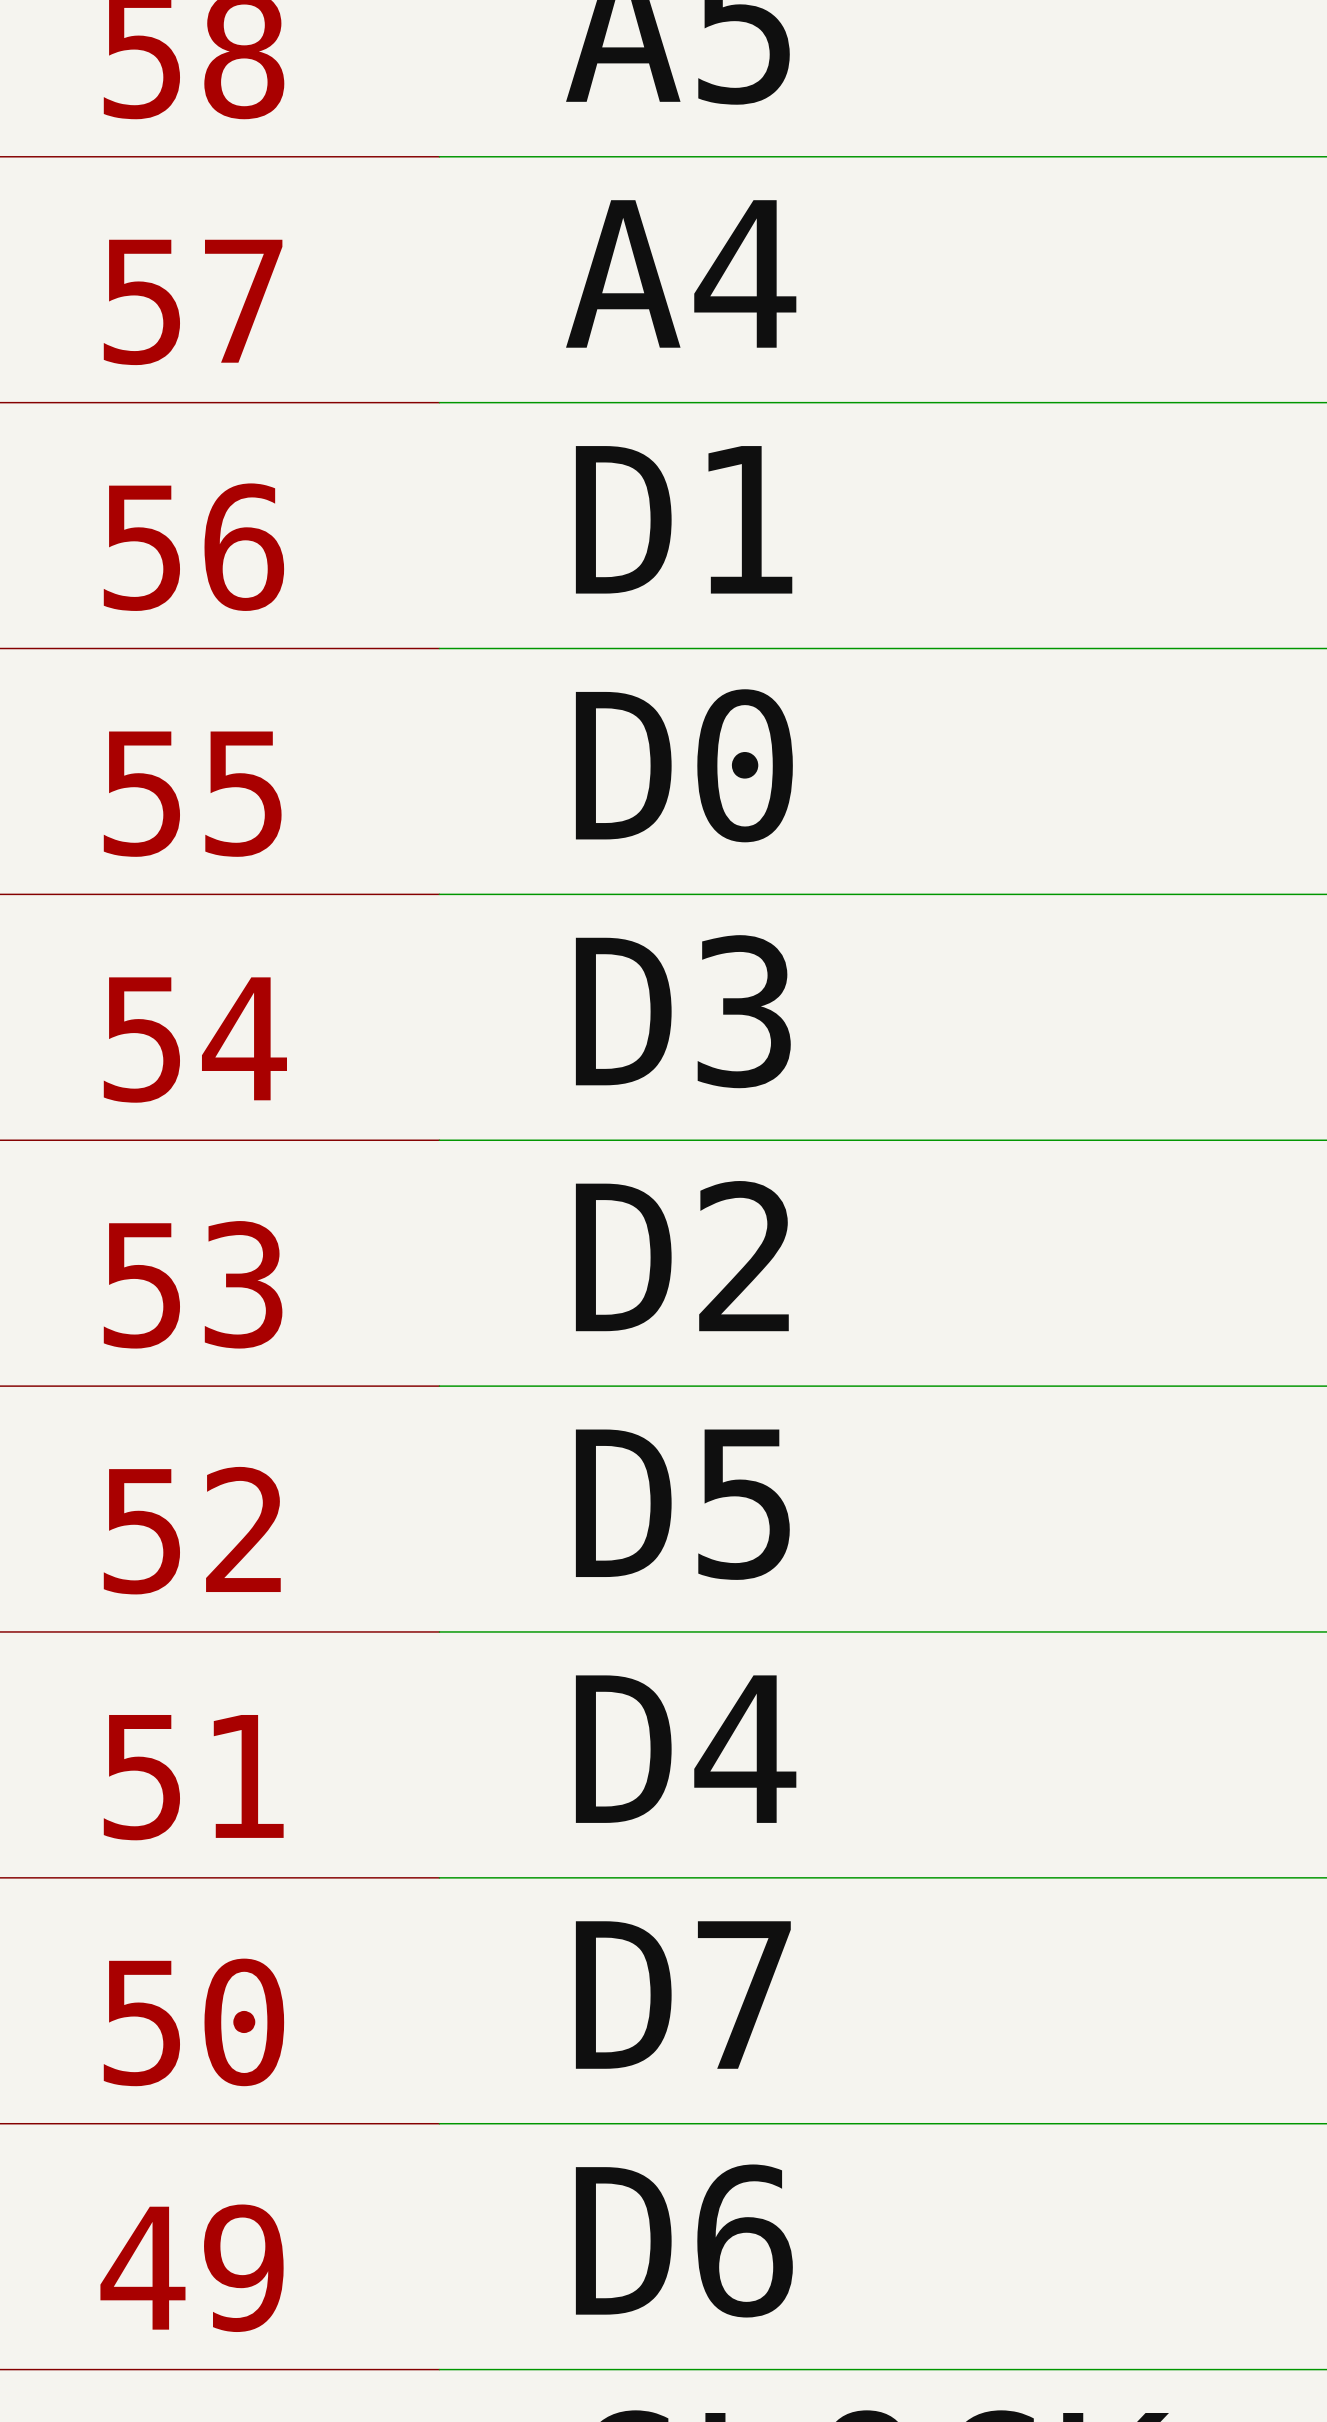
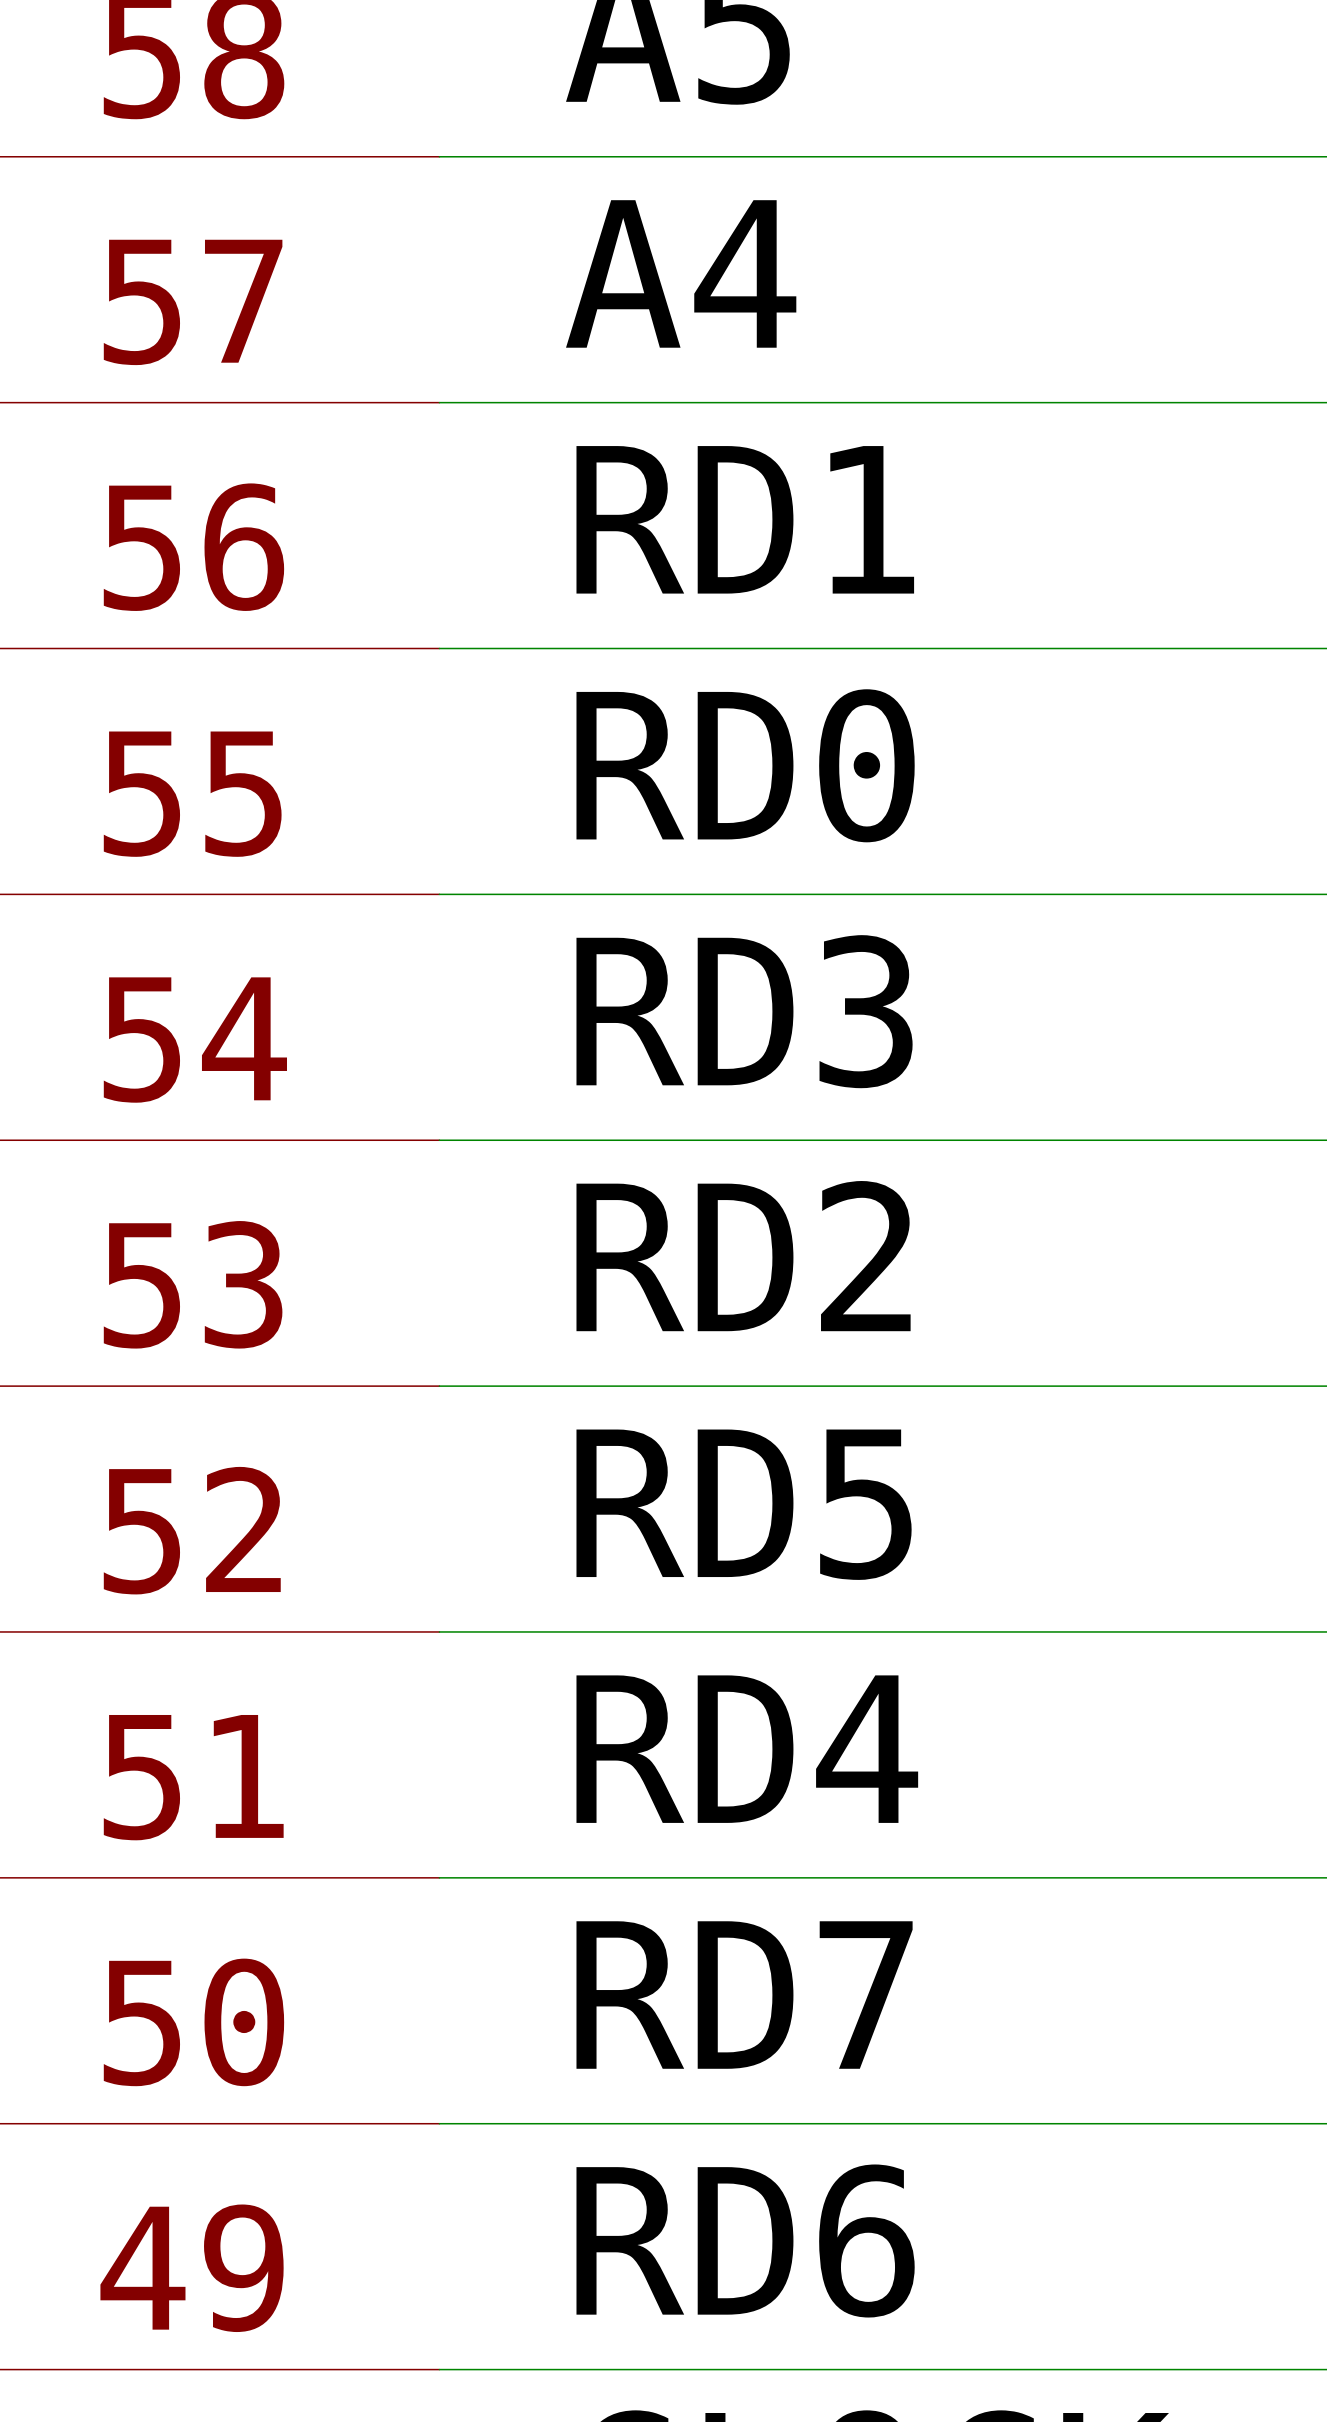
label: D1 (684, 519) -> RD1 (745, 519)
label: D0 (684, 765) -> RD0 (745, 765)
label: D3 (683, 1011) -> RD3 (744, 1011)
label: D2 (682, 1256) -> RD2 (743, 1256)
label: D5 (682, 1504) -> RD5 (744, 1504)
label: D4 (686, 1749) -> RD4 (747, 1749)
label: D7 (683, 1995) -> RD7 (744, 1995)
label: D6 (684, 2241) -> RD6 (745, 2241)

